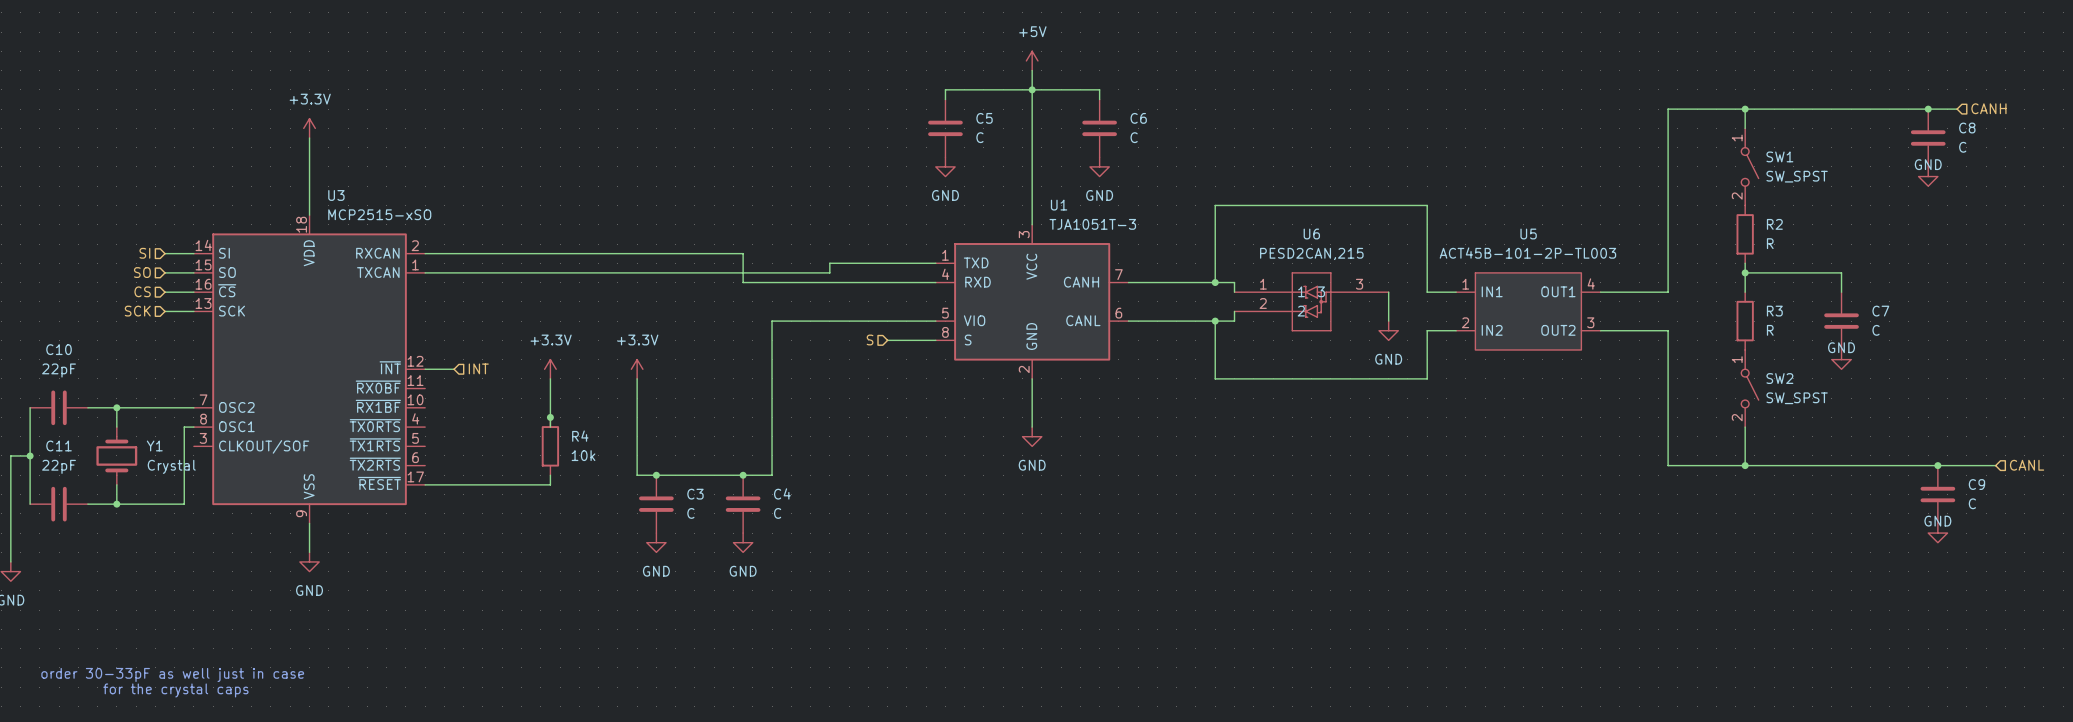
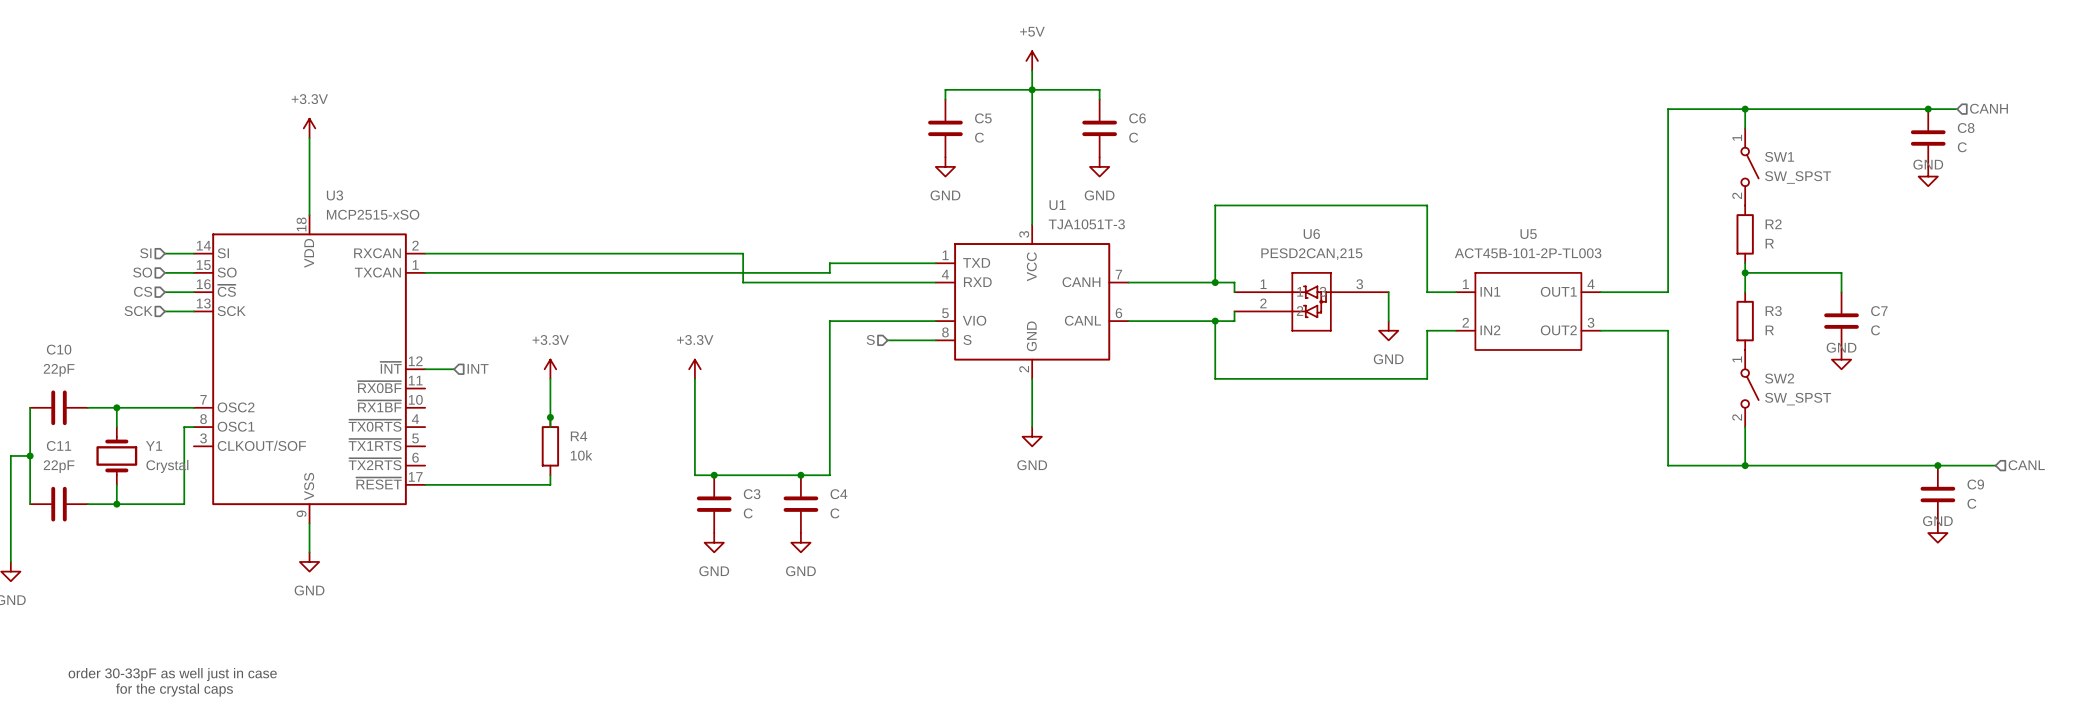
wire: (829, 321) (772, 321) (772, 475) -> (829, 321) (829, 475) (772, 475)
power symbol position: +3.3V (637, 369) -> +3.3V (694, 369)
wire: (637, 378) (637, 475) (694, 475) -> (694, 378) (694, 475)
junction: (656, 475) -> none
junction: none -> (714, 475)
junction: (743, 475) -> none
junction: none -> (800, 475)
C3 position: (656, 504) -> (714, 504)
C4 position: (743, 504) -> (800, 504)
power symbol: GND (656, 542) -> none
power symbol: none -> GND (714, 542)
power symbol: GND (743, 542) -> none
power symbol: none -> GND (800, 542)

